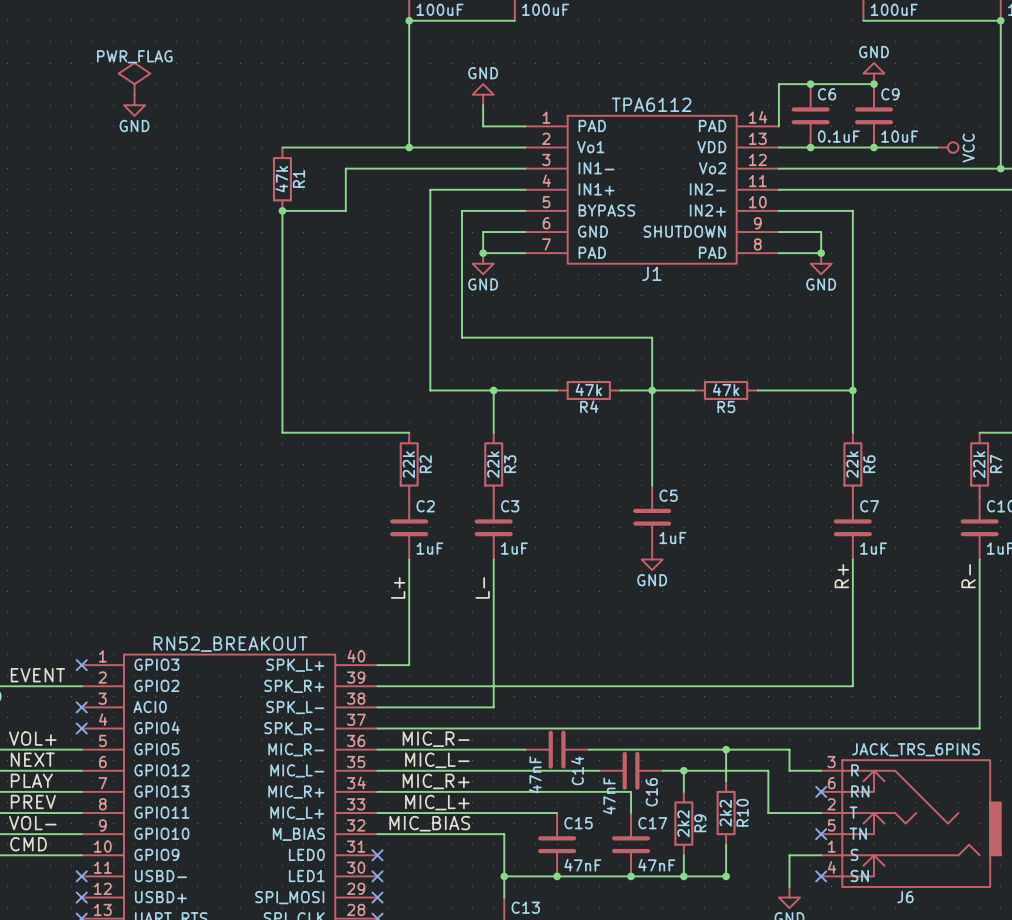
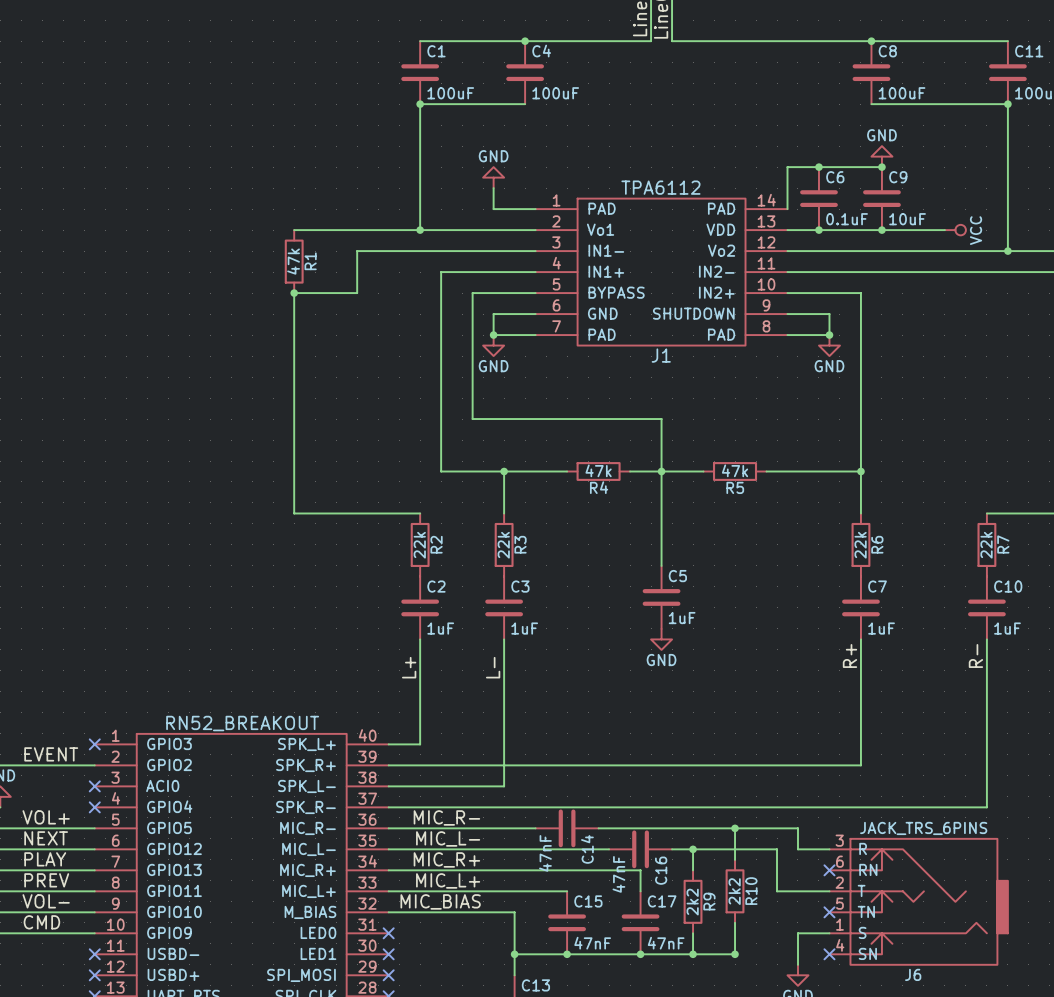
power symbol: PWR_FLAG (134, 78) -> none
power symbol: GND (134, 105) -> none

